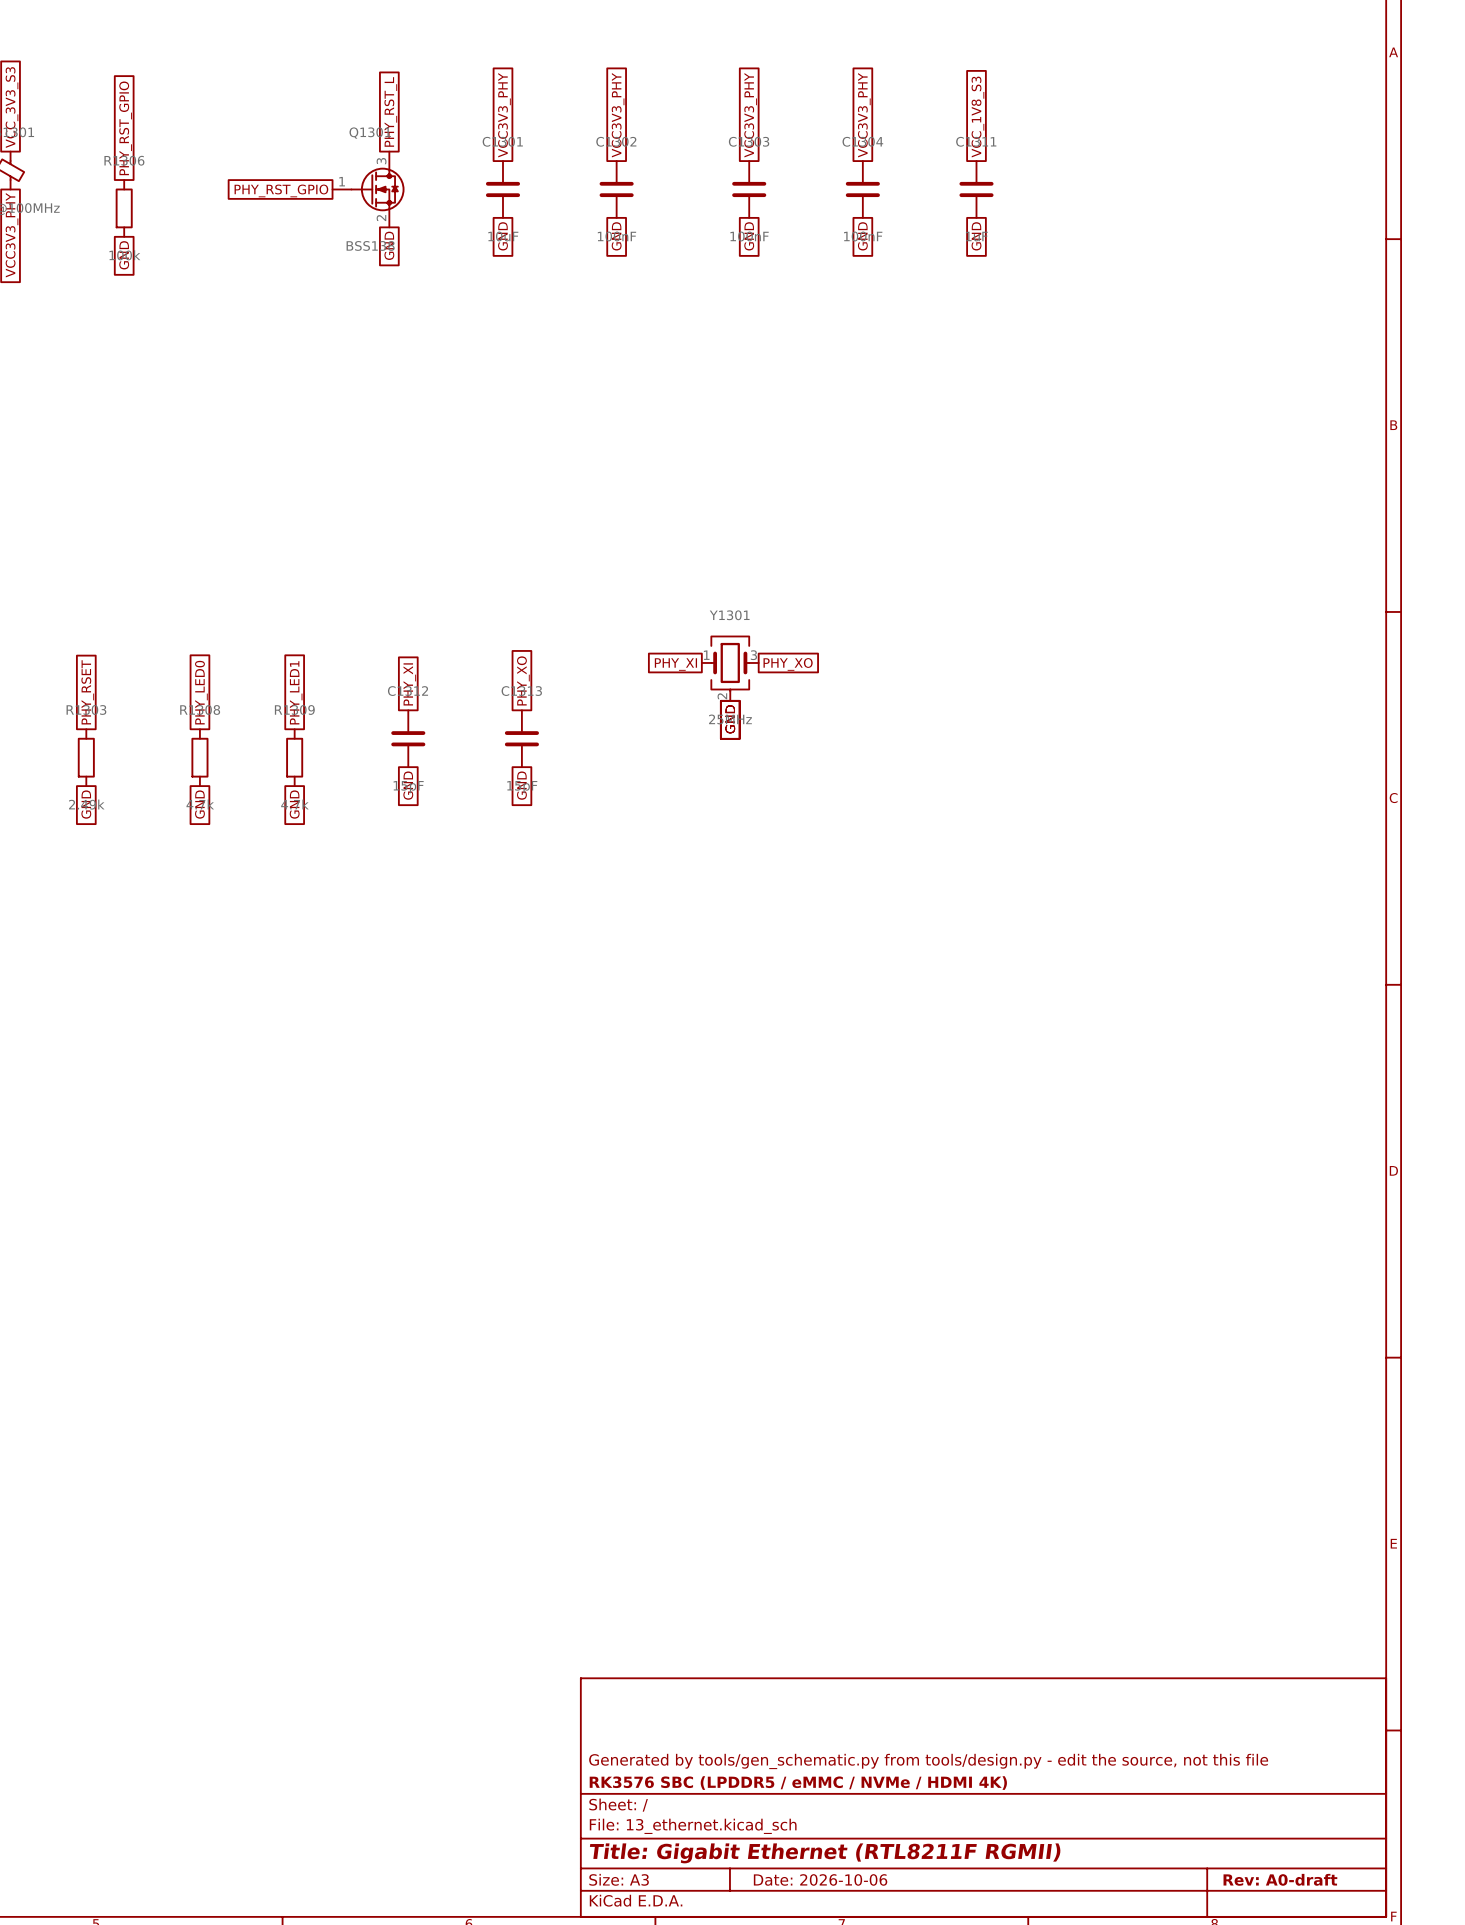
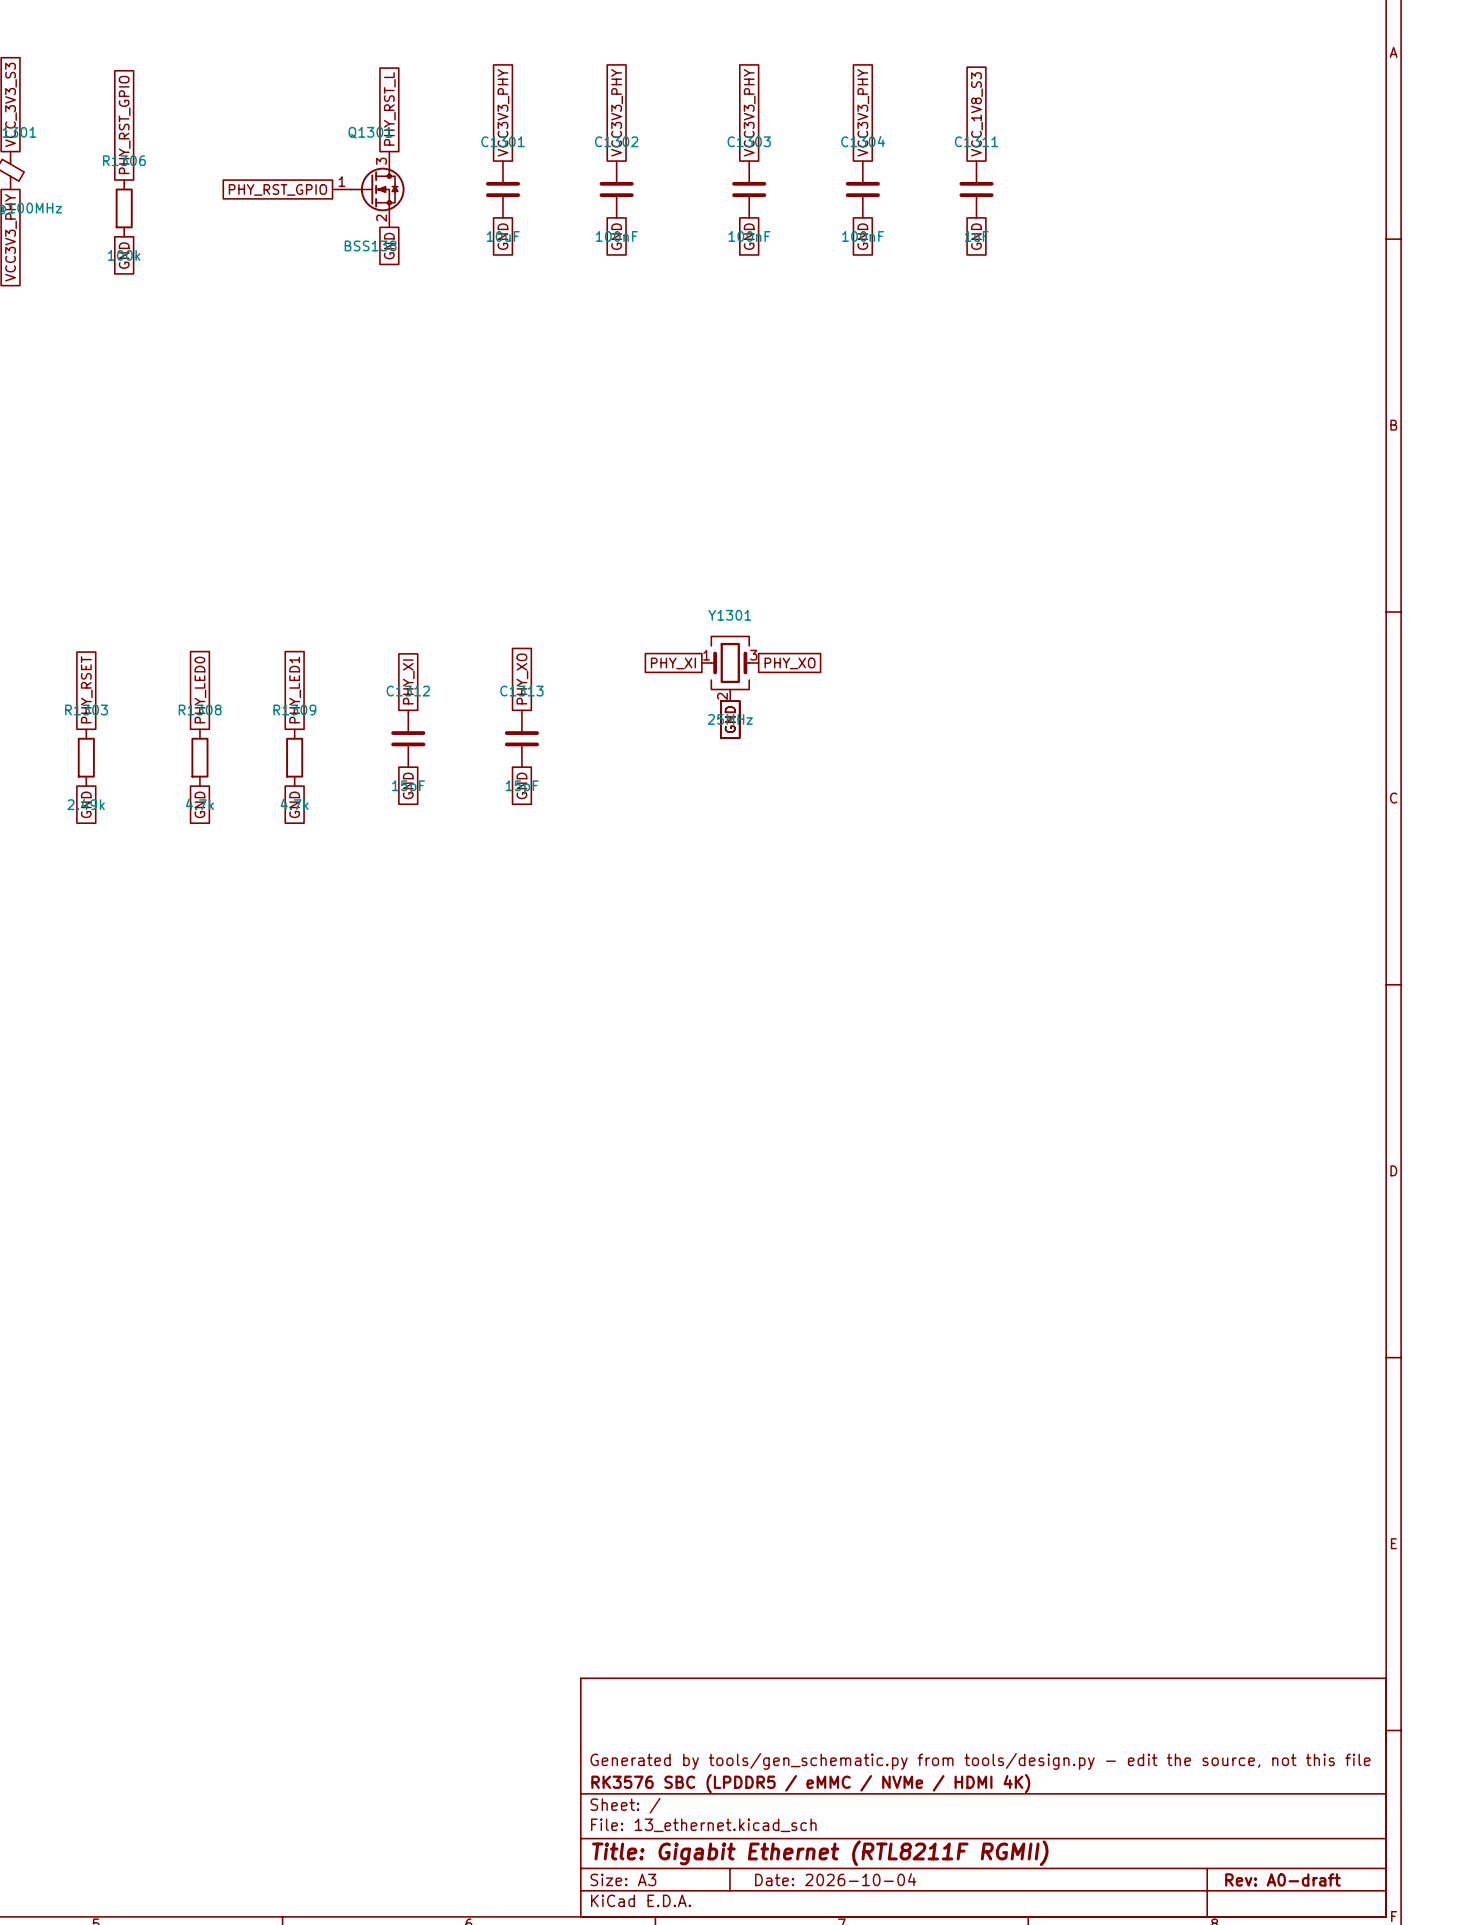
title block: Date: 2026-10-06 (820, 1879) -> Date: 2026-10-04 (835, 1879)

